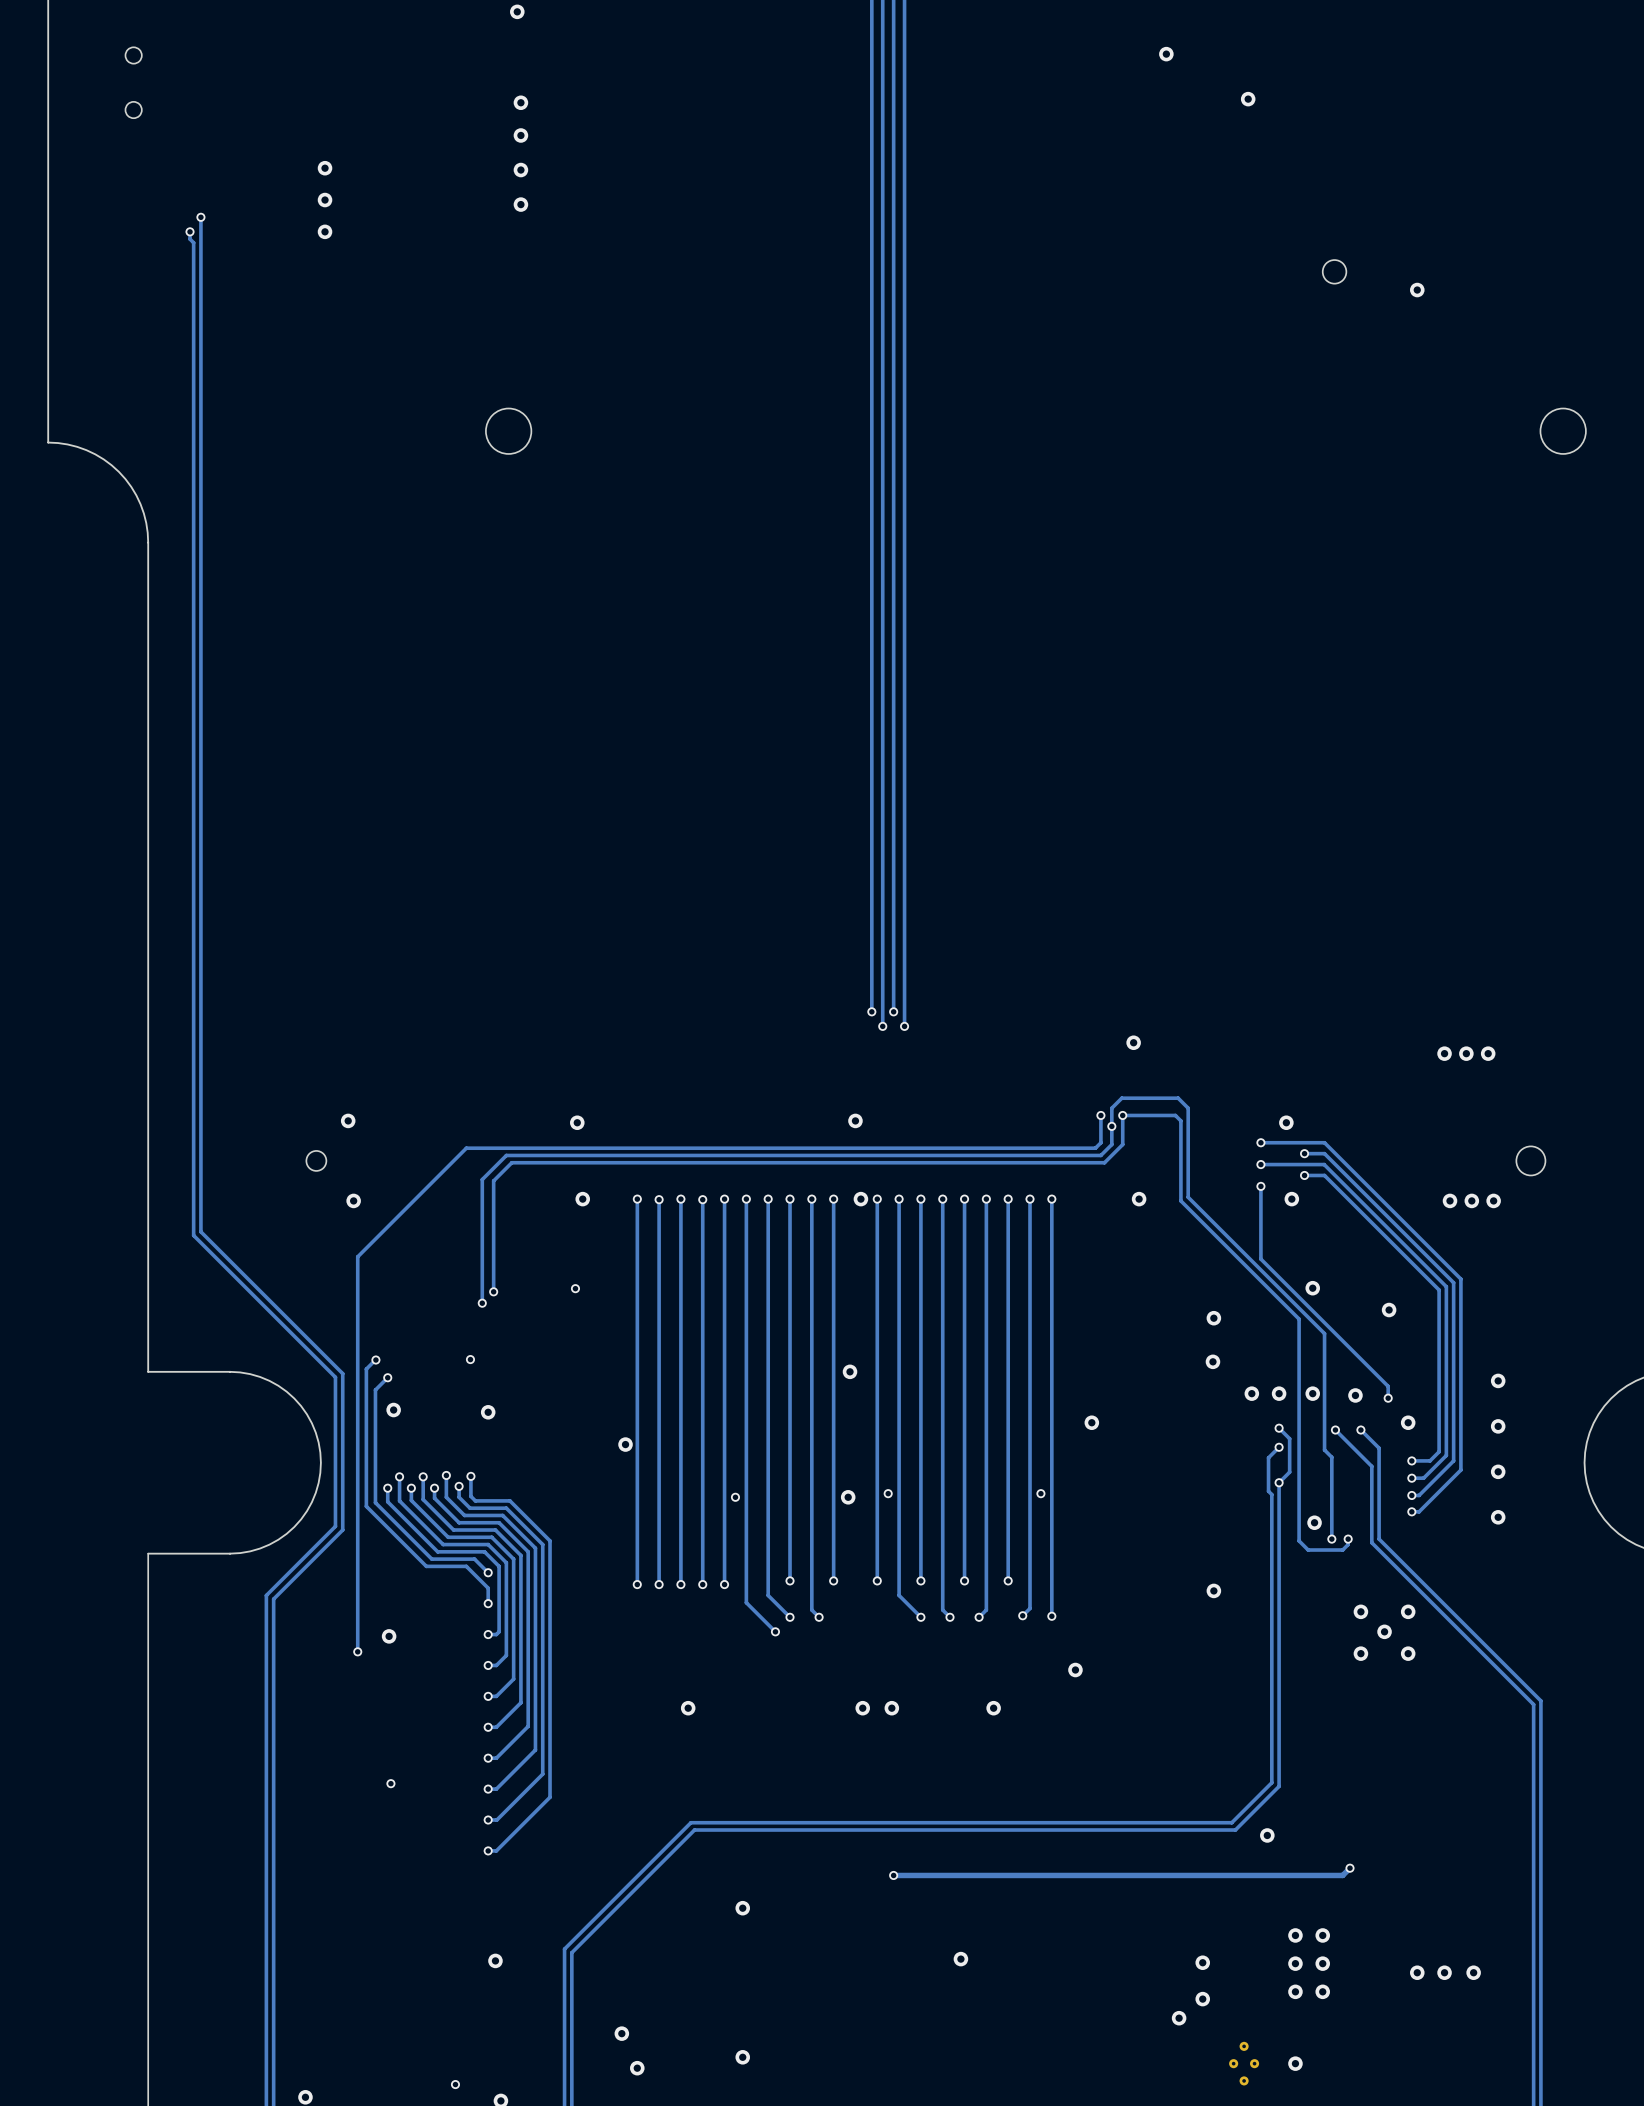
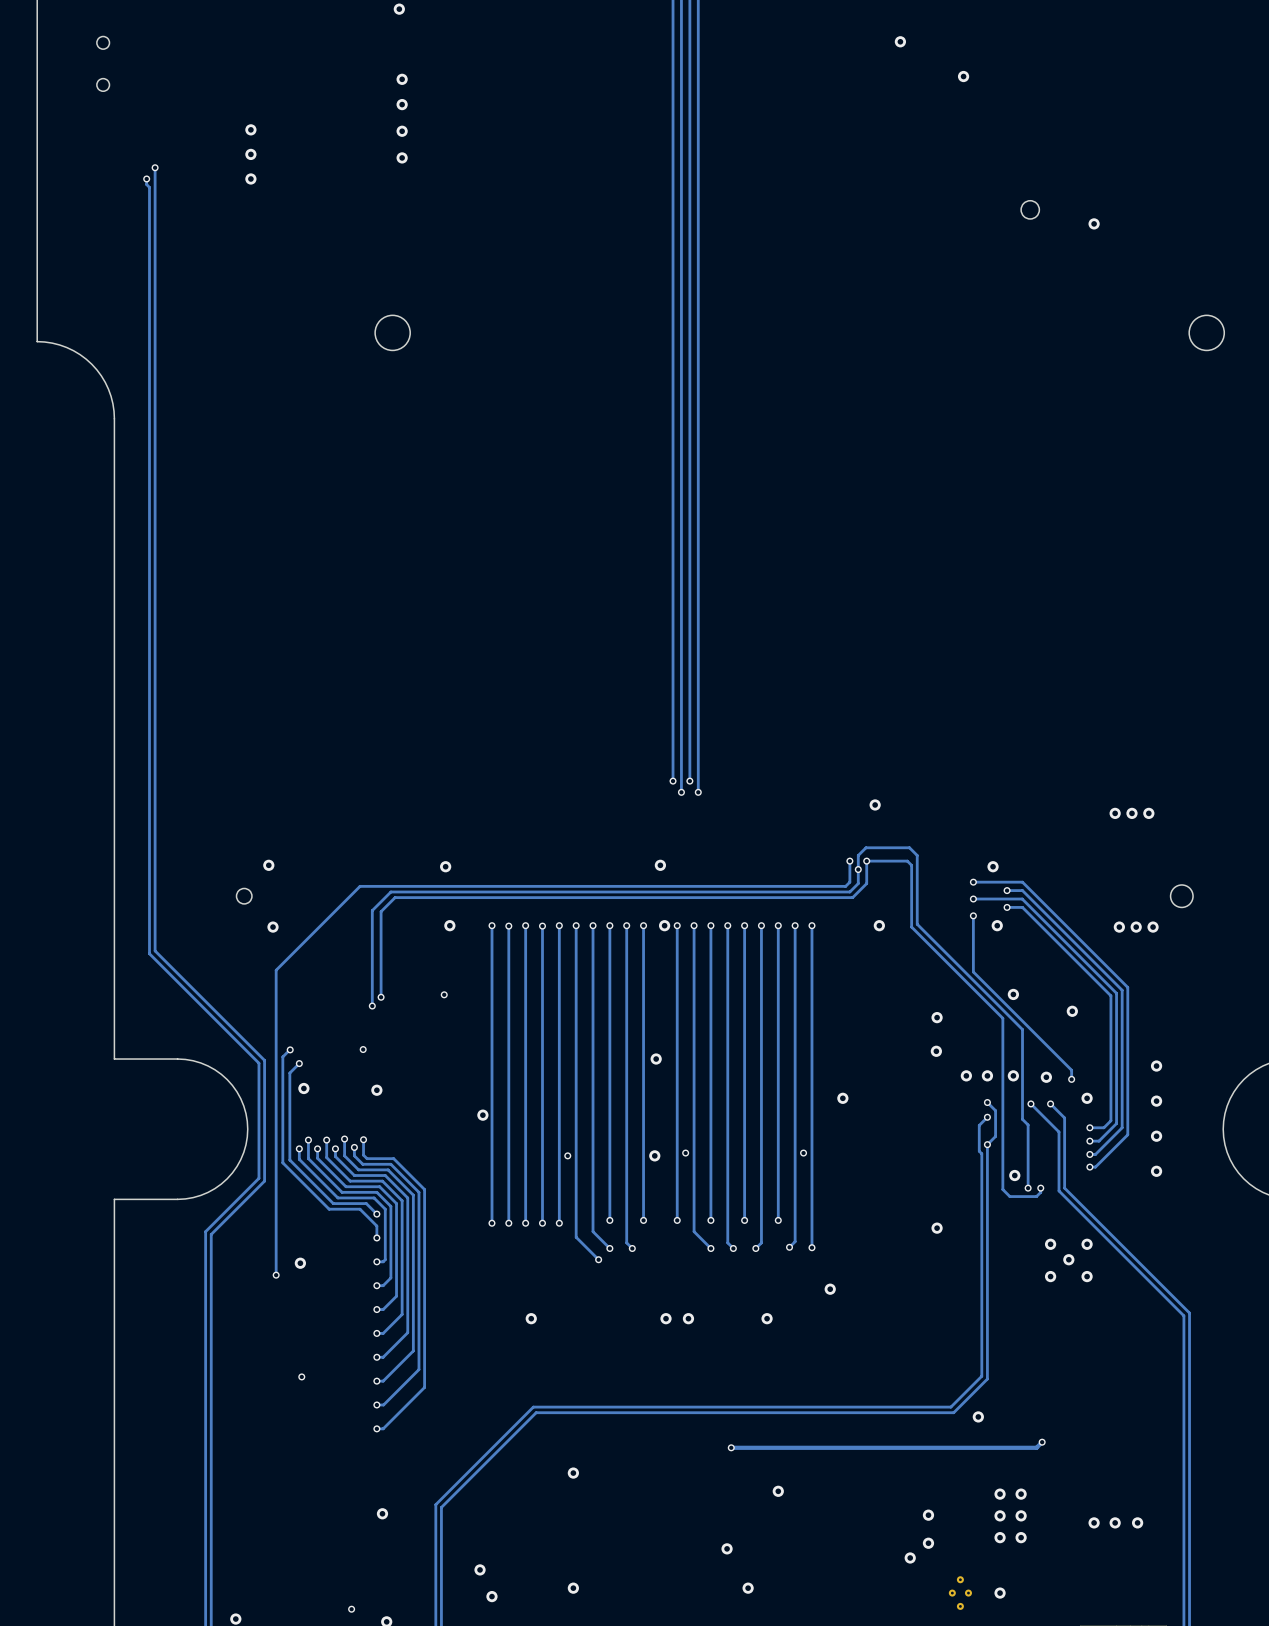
via position: (893, 1875) -> (731, 1447)
track: (947, 1875) (893, 1875) -> none
via: none -> (778, 1491)
via: (960, 1959) -> none
via: none -> (727, 1548)
via: none -> (748, 1588)

